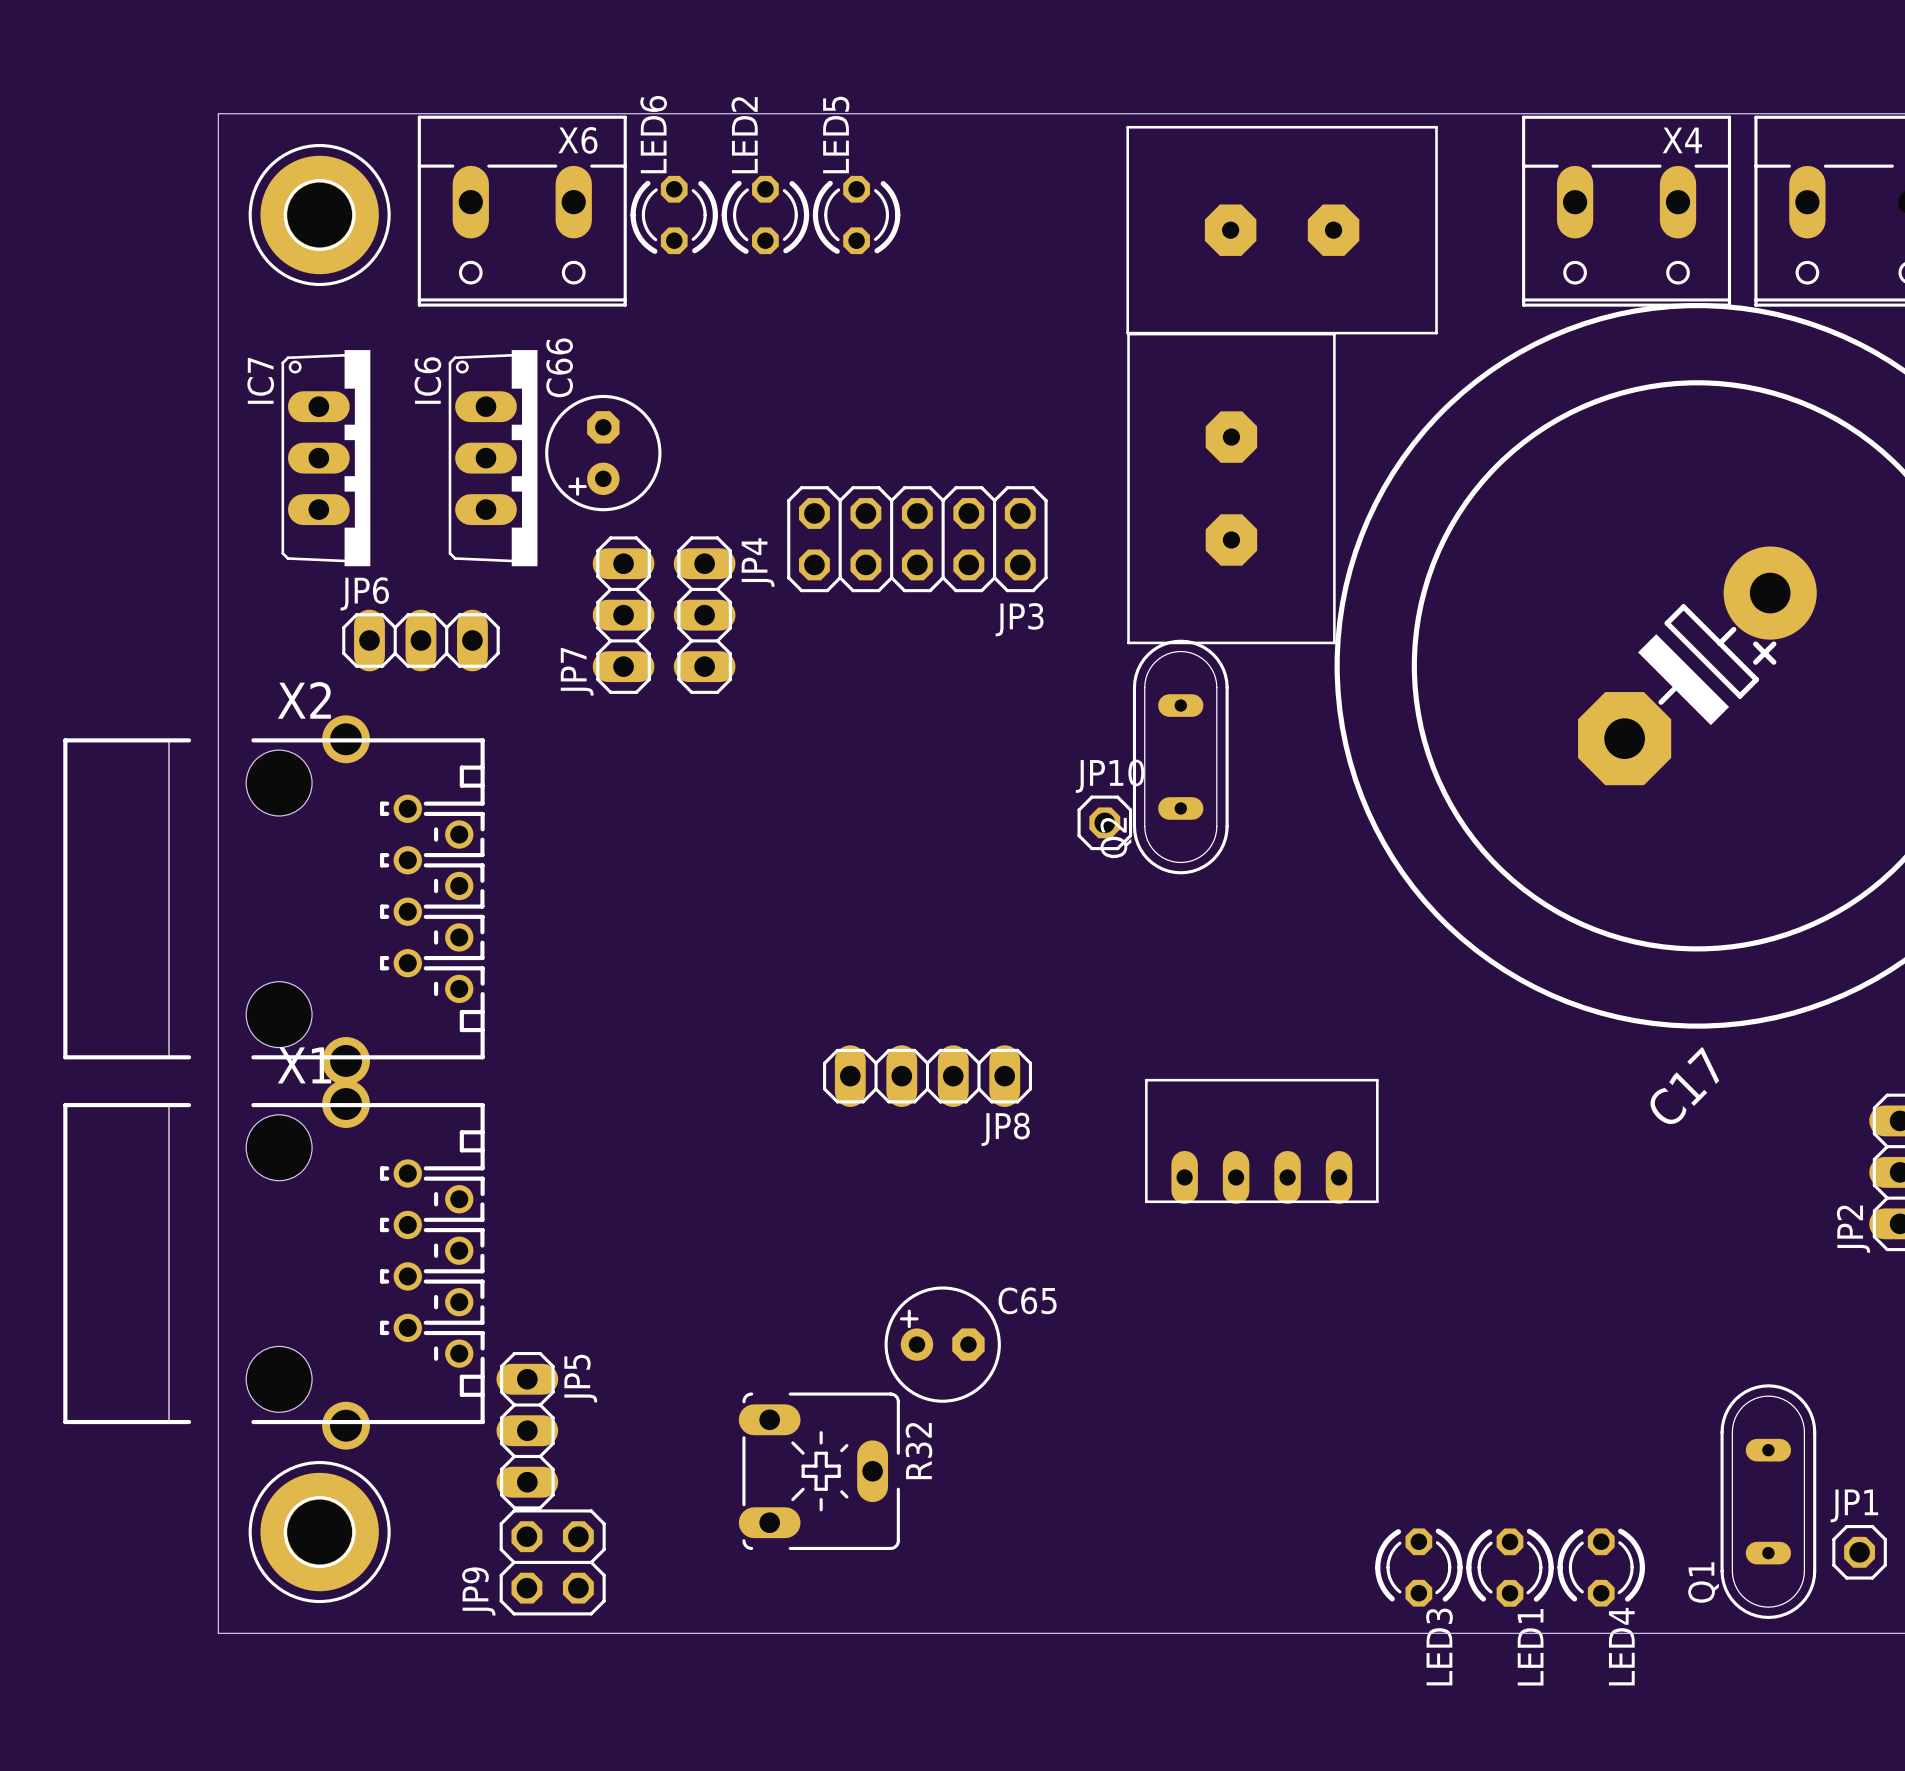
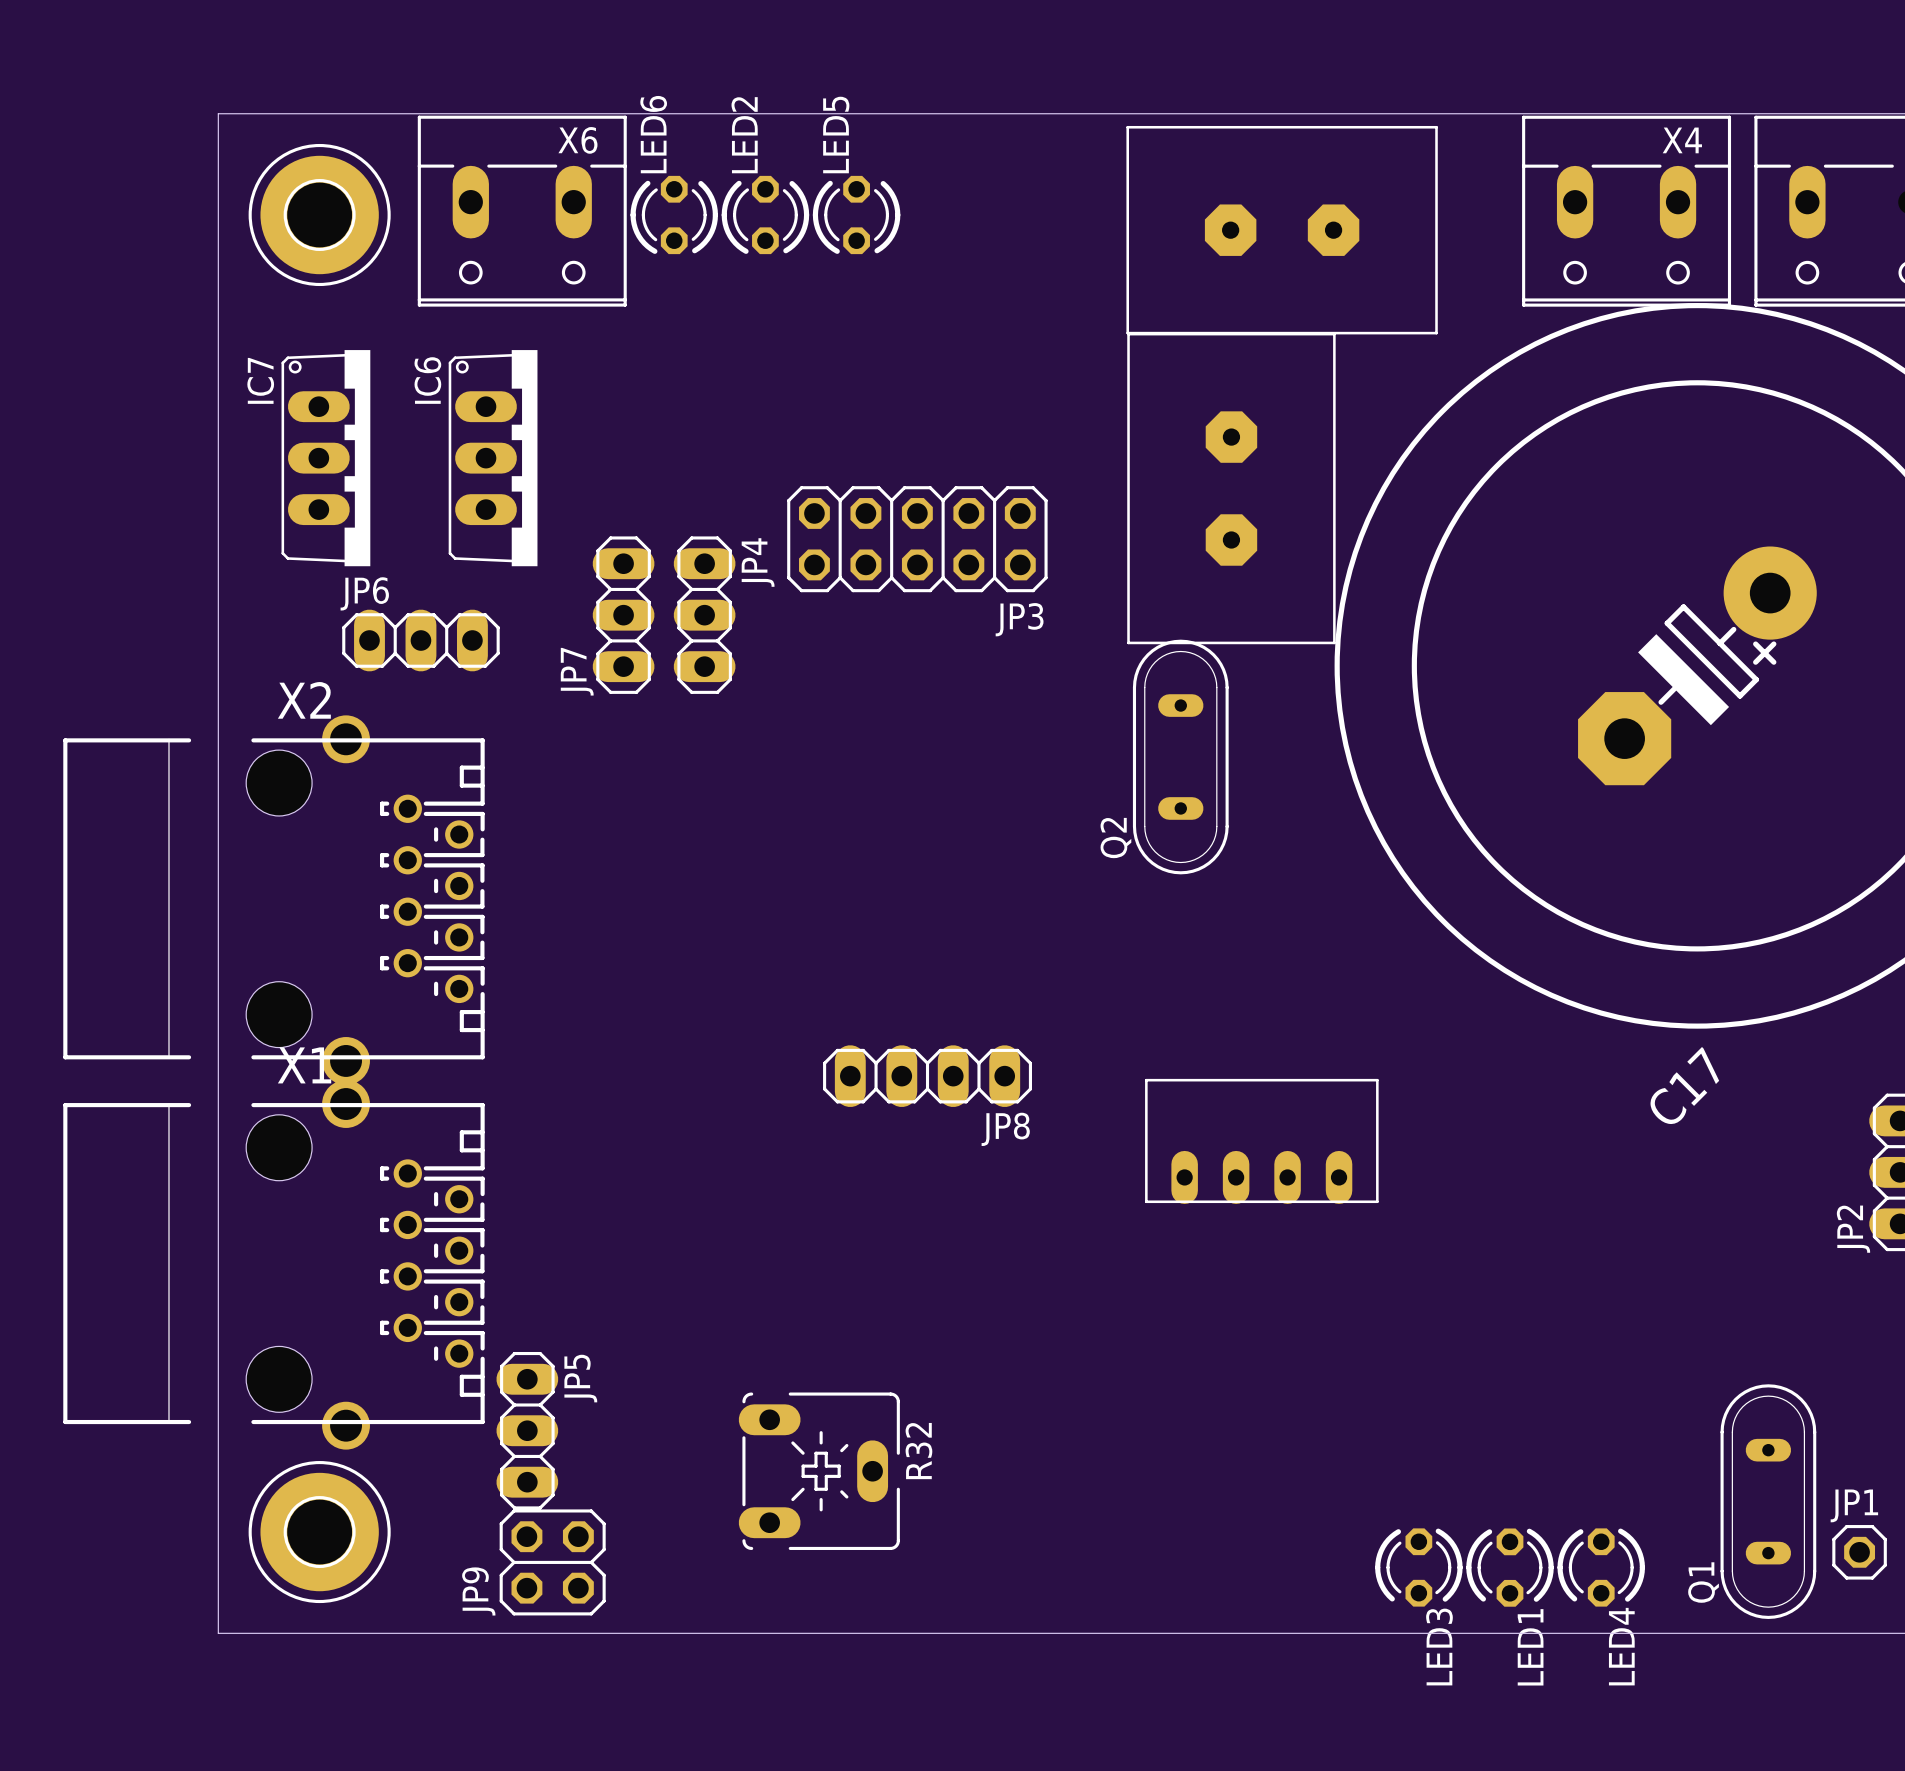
C66: (603, 453) -> none
JP10: (1104, 822) -> none
C65: (942, 1344) -> none

